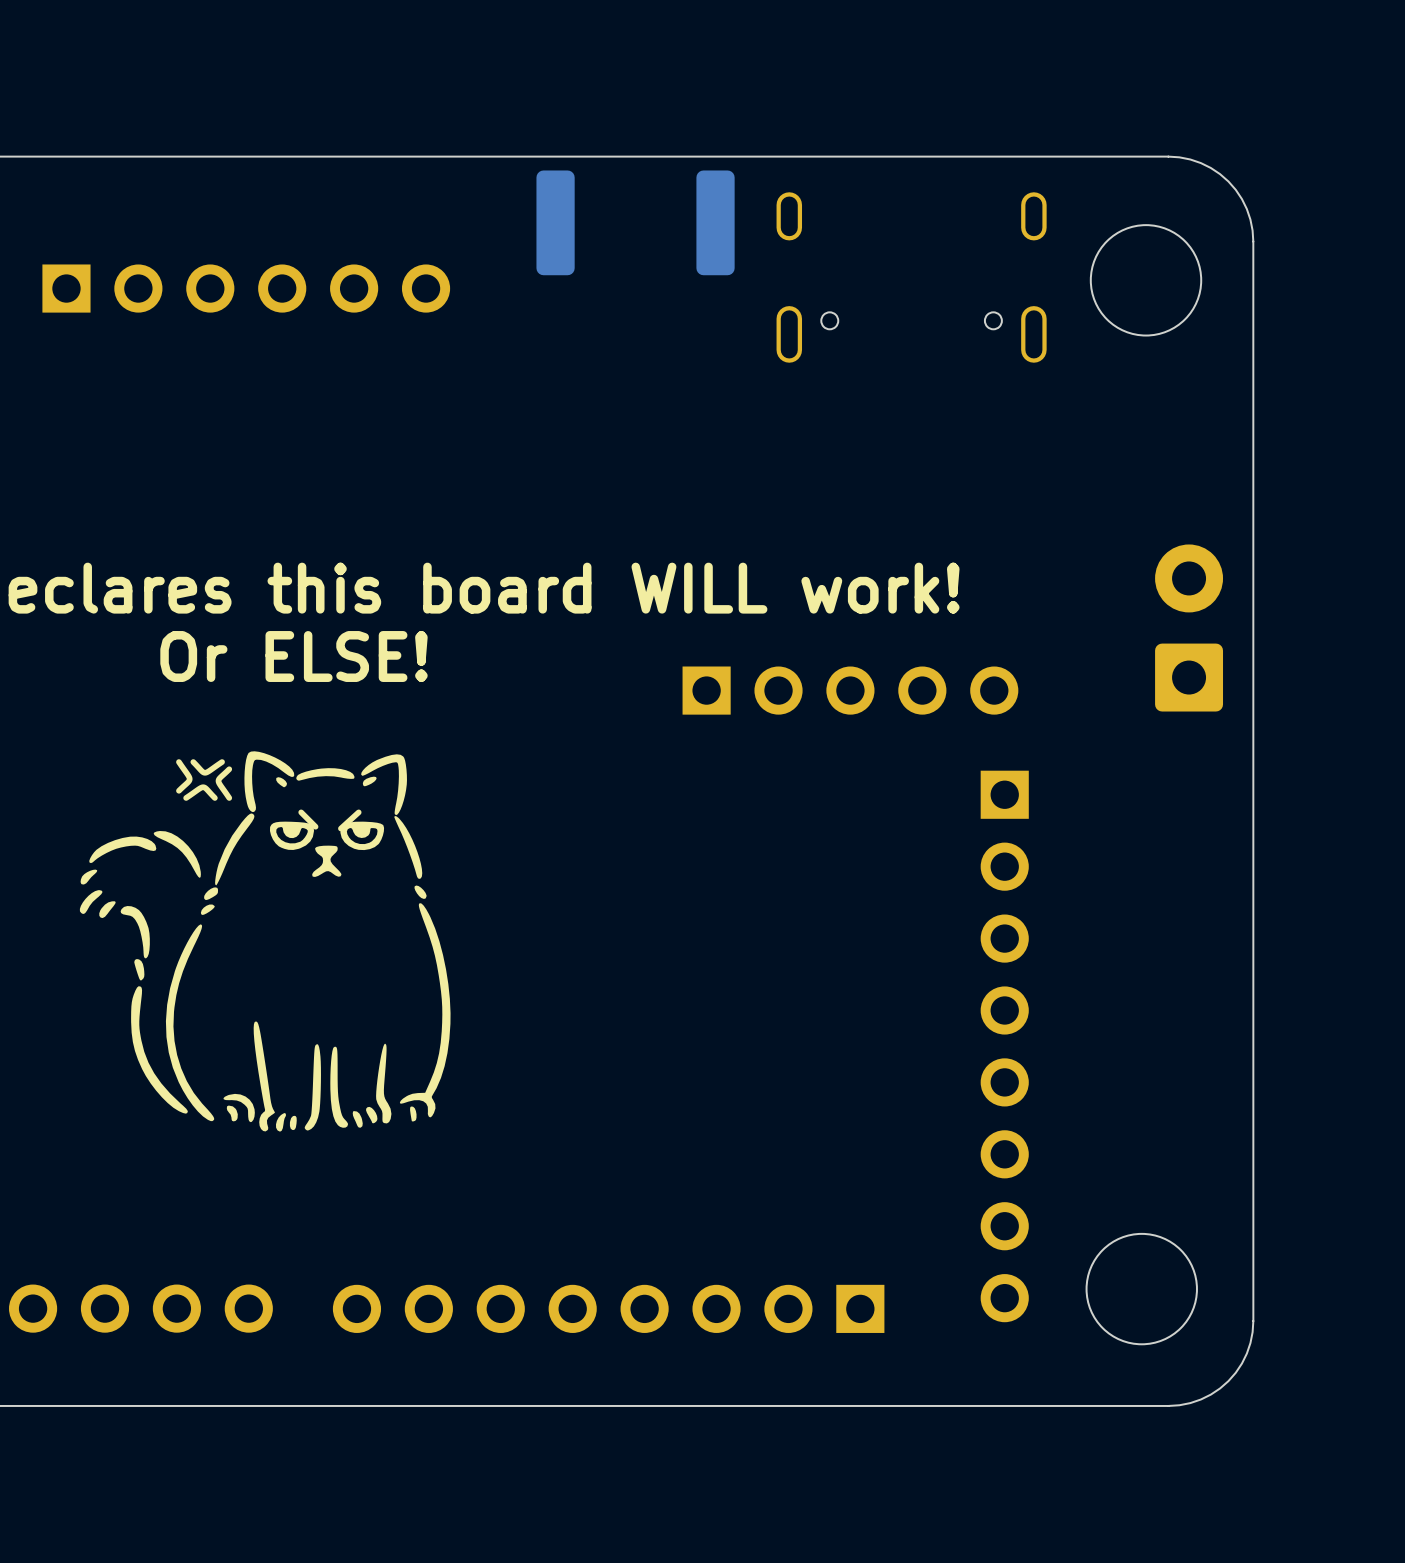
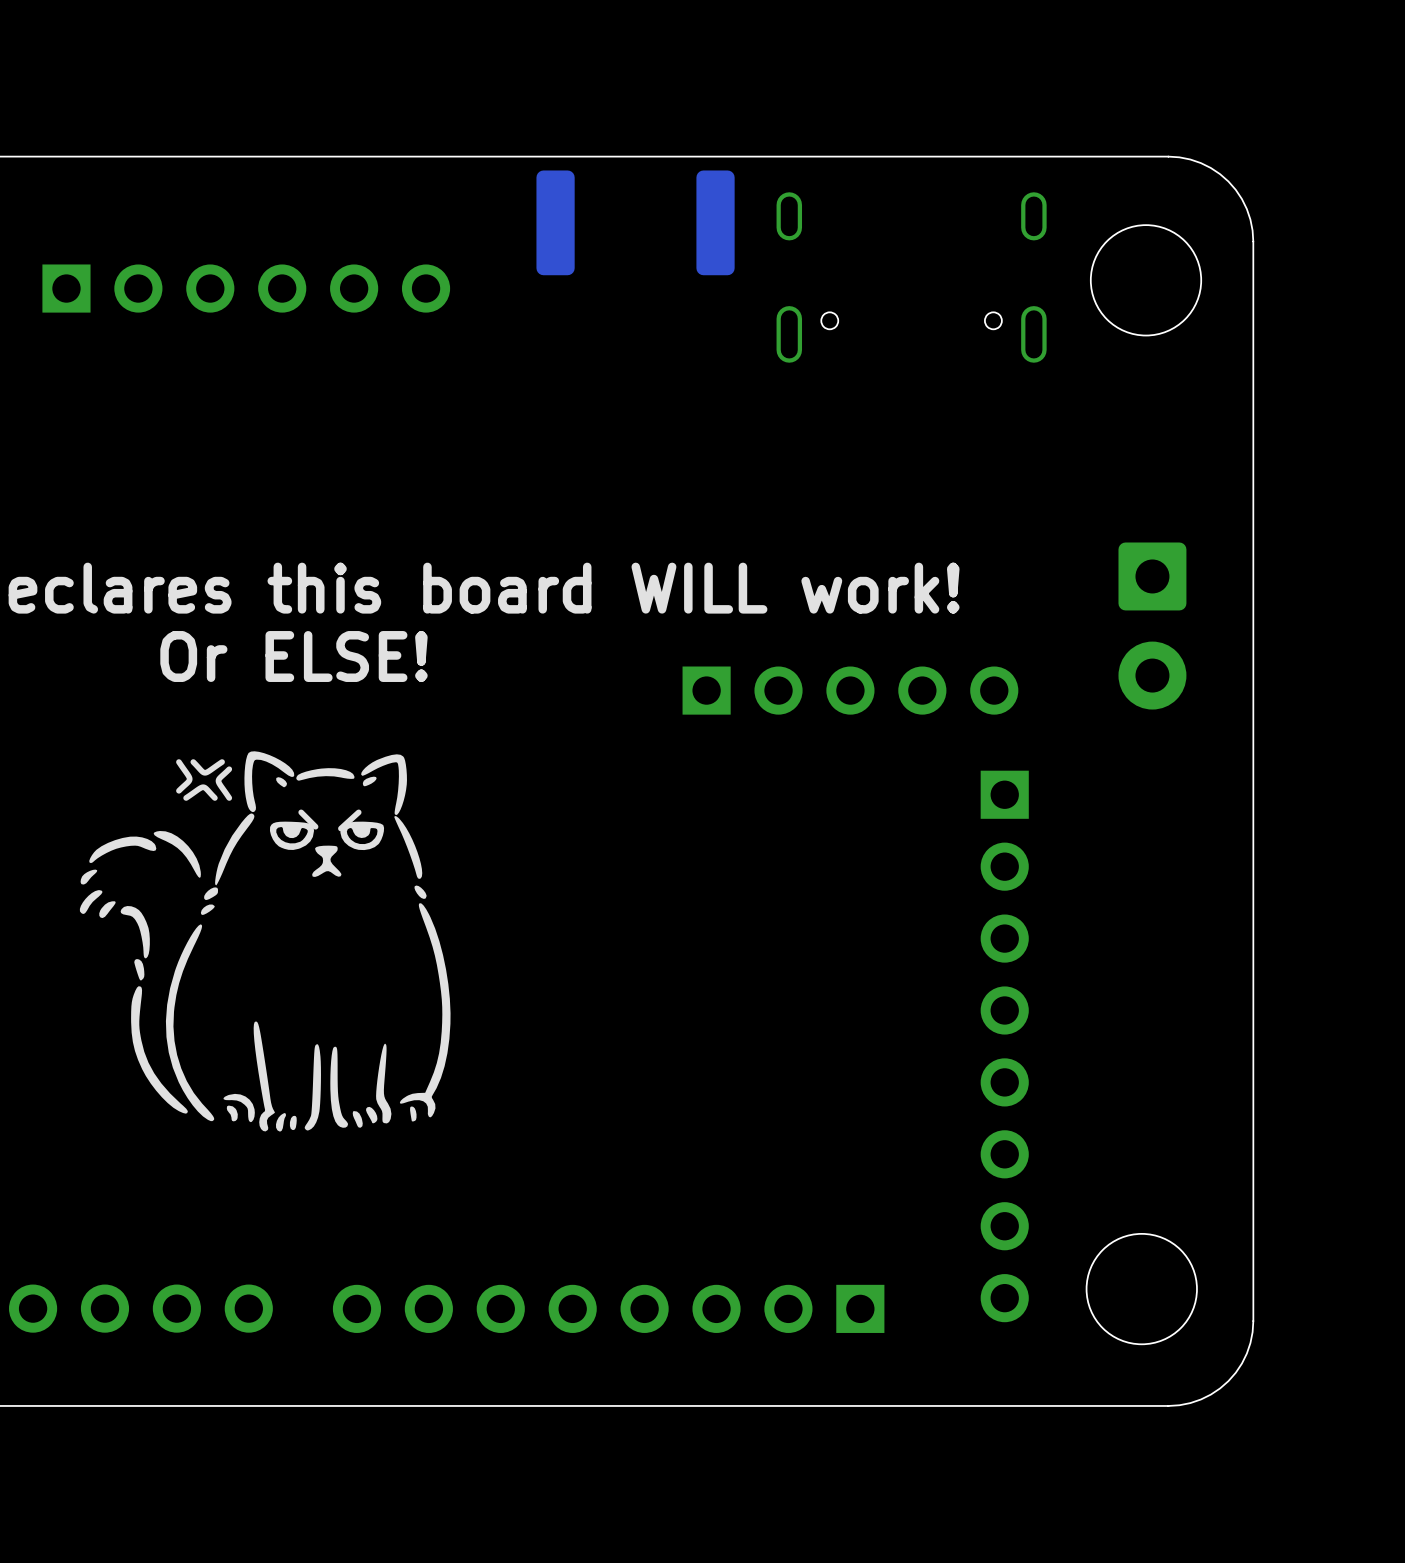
part rotation: 0° (1189, 628) -> 180° (1152, 626)

